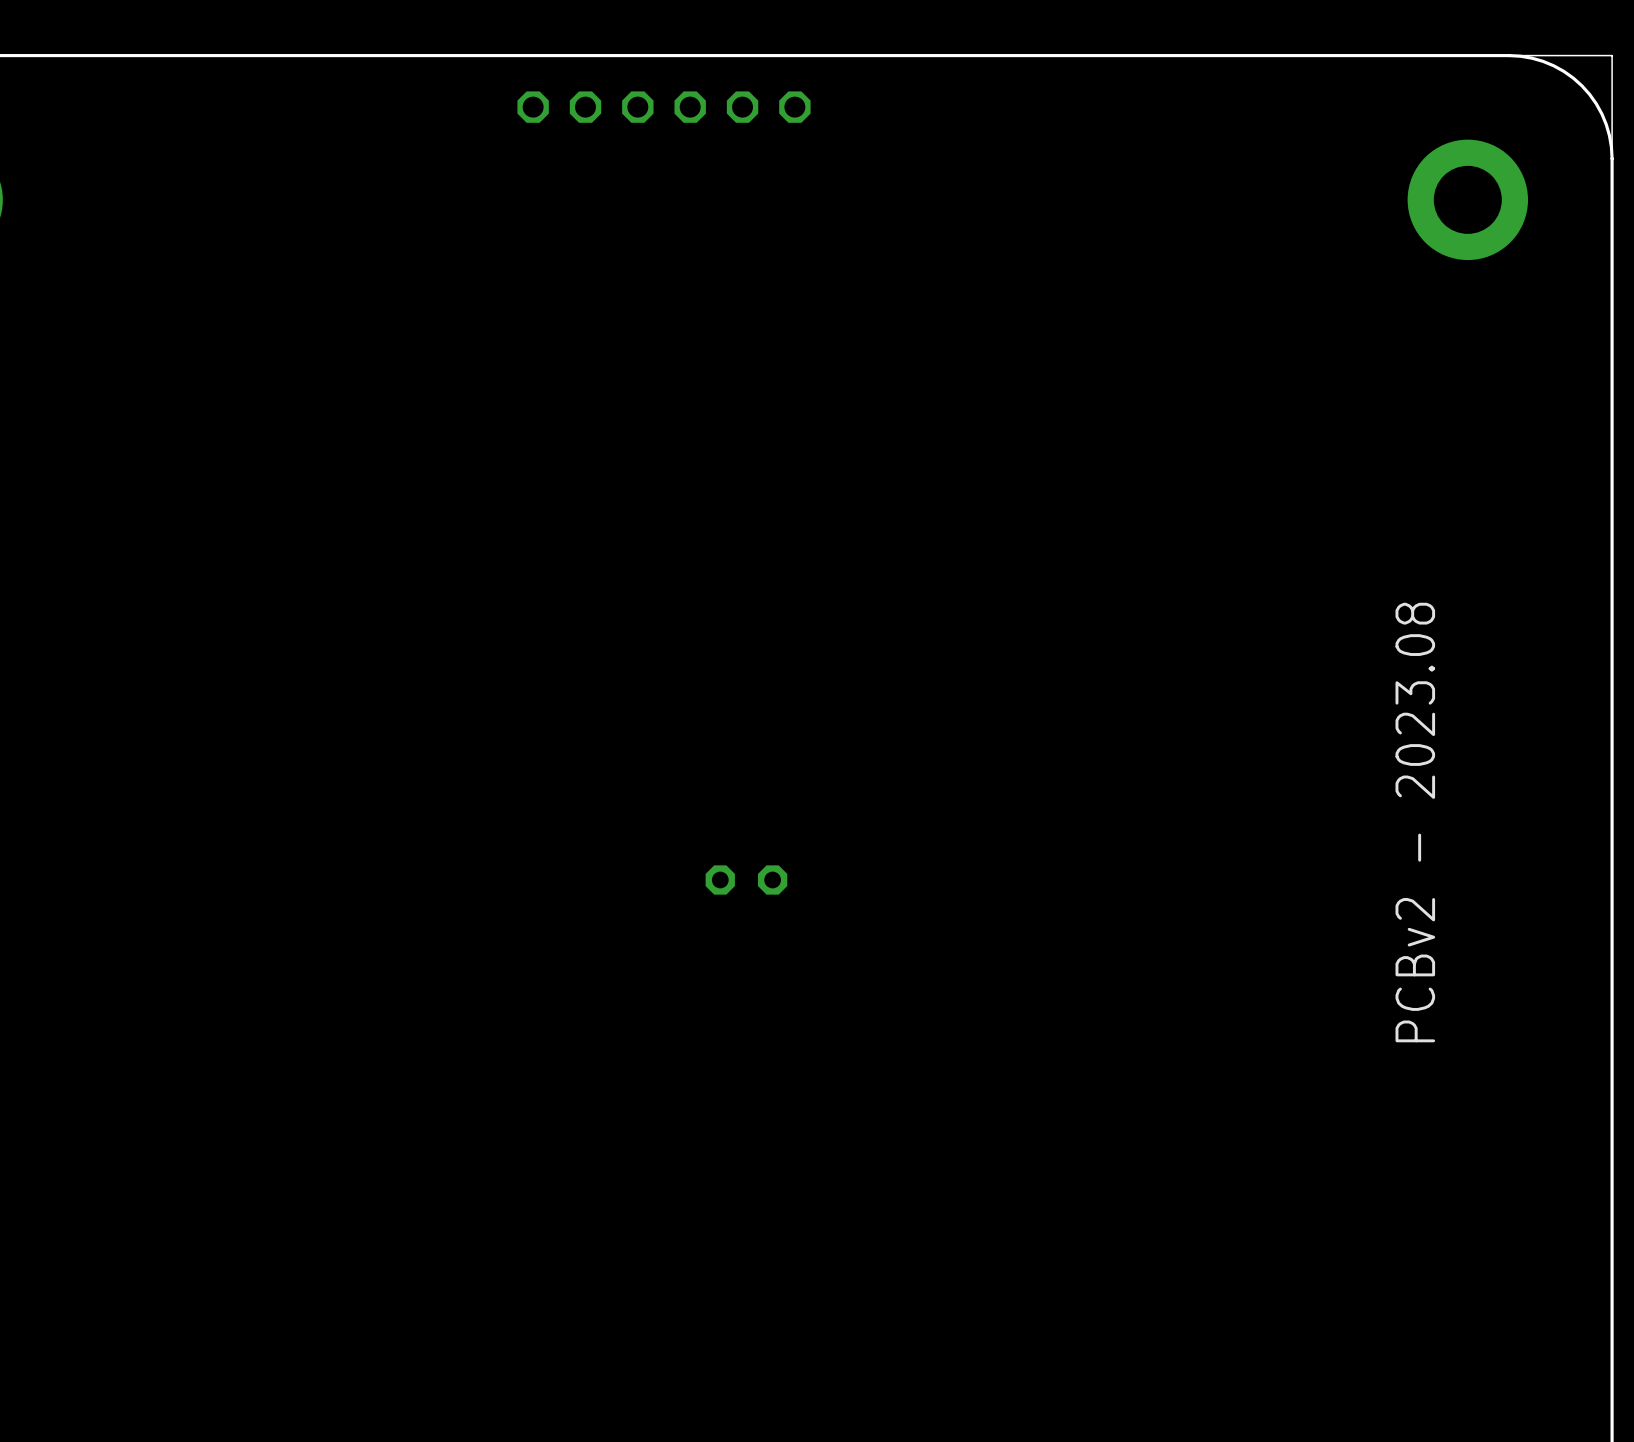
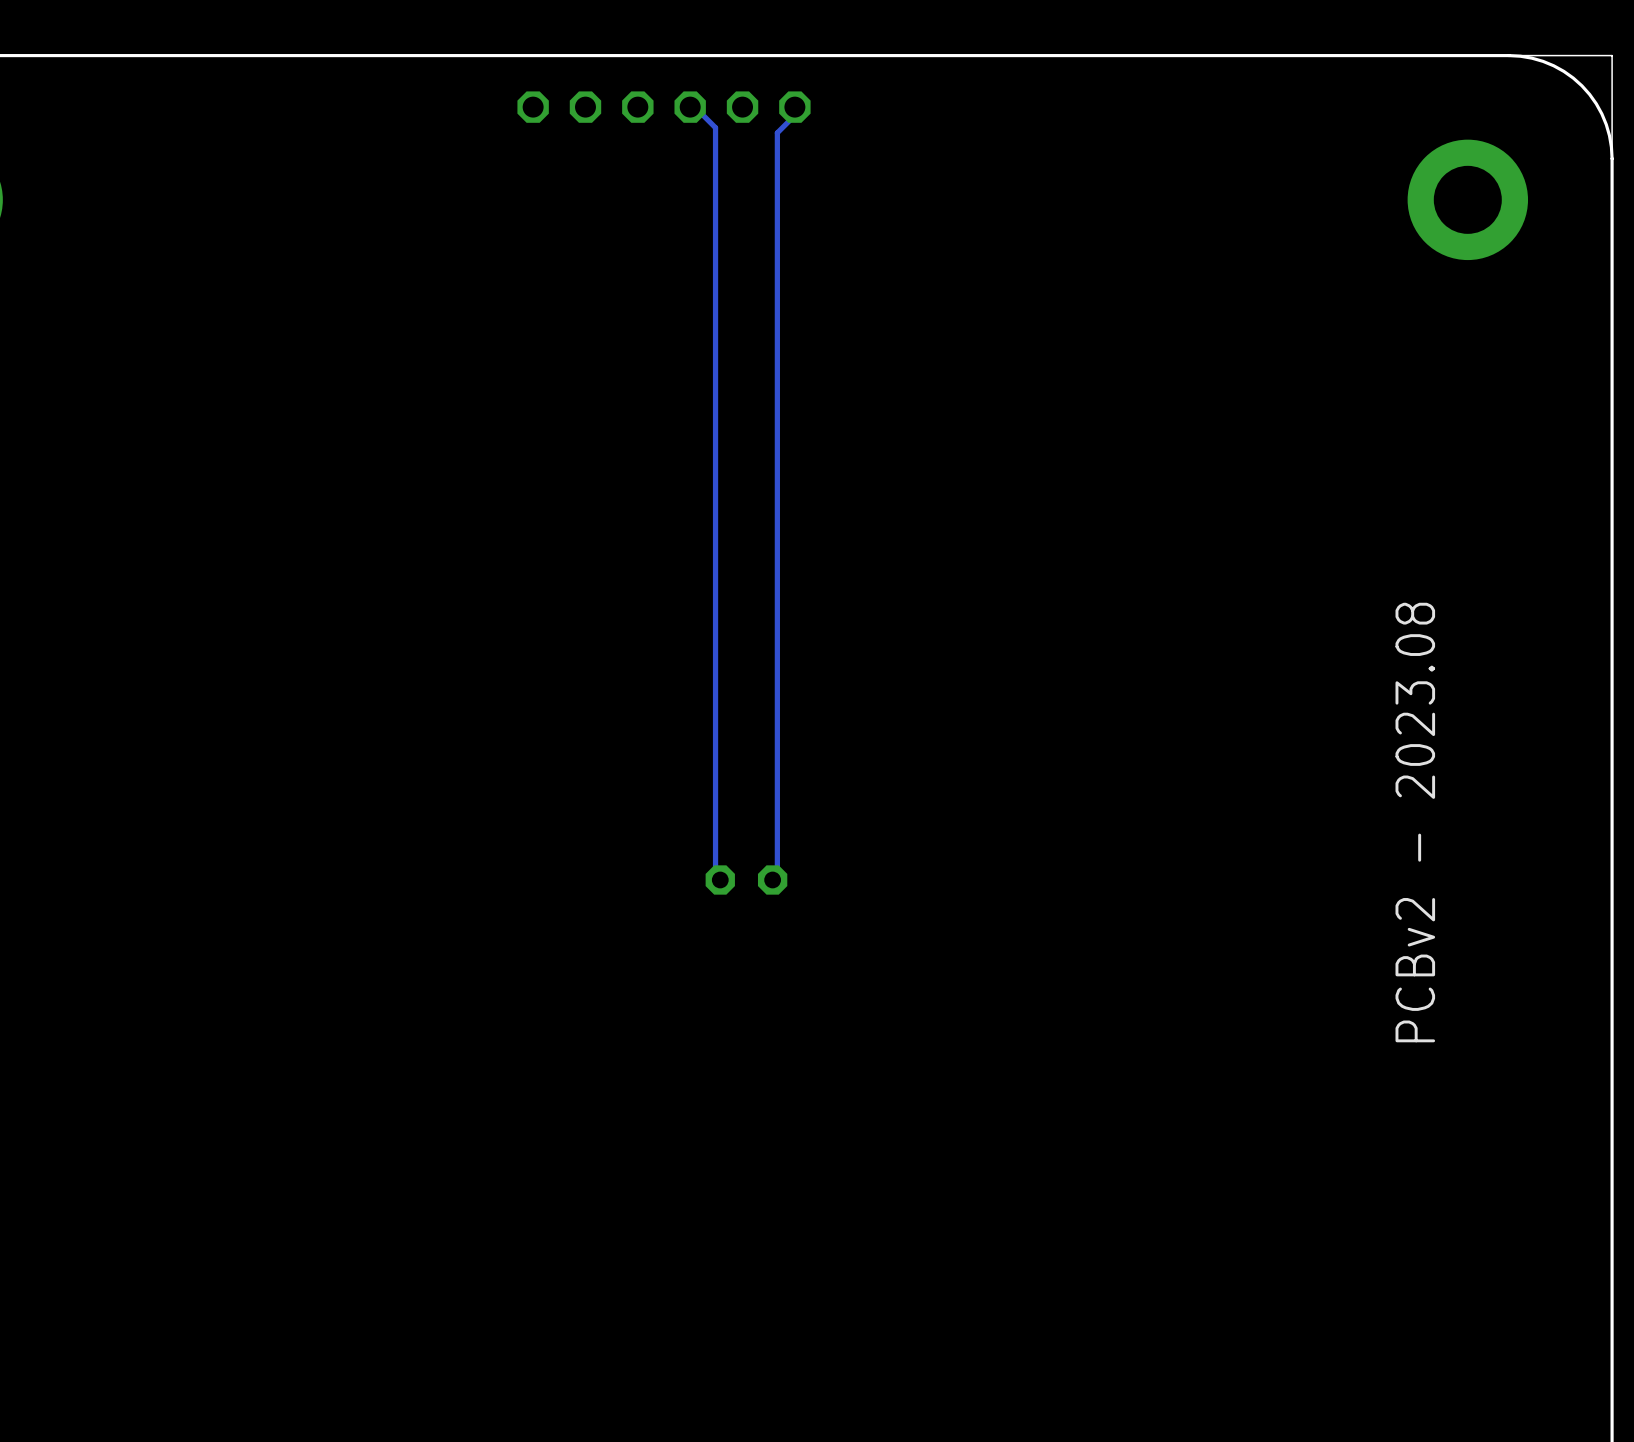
track: none -> (690, 107) (694, 107) (715, 127) (715, 879) (720, 879)
track: none -> (792, 117) (777, 132) (777, 879) (772, 879)

